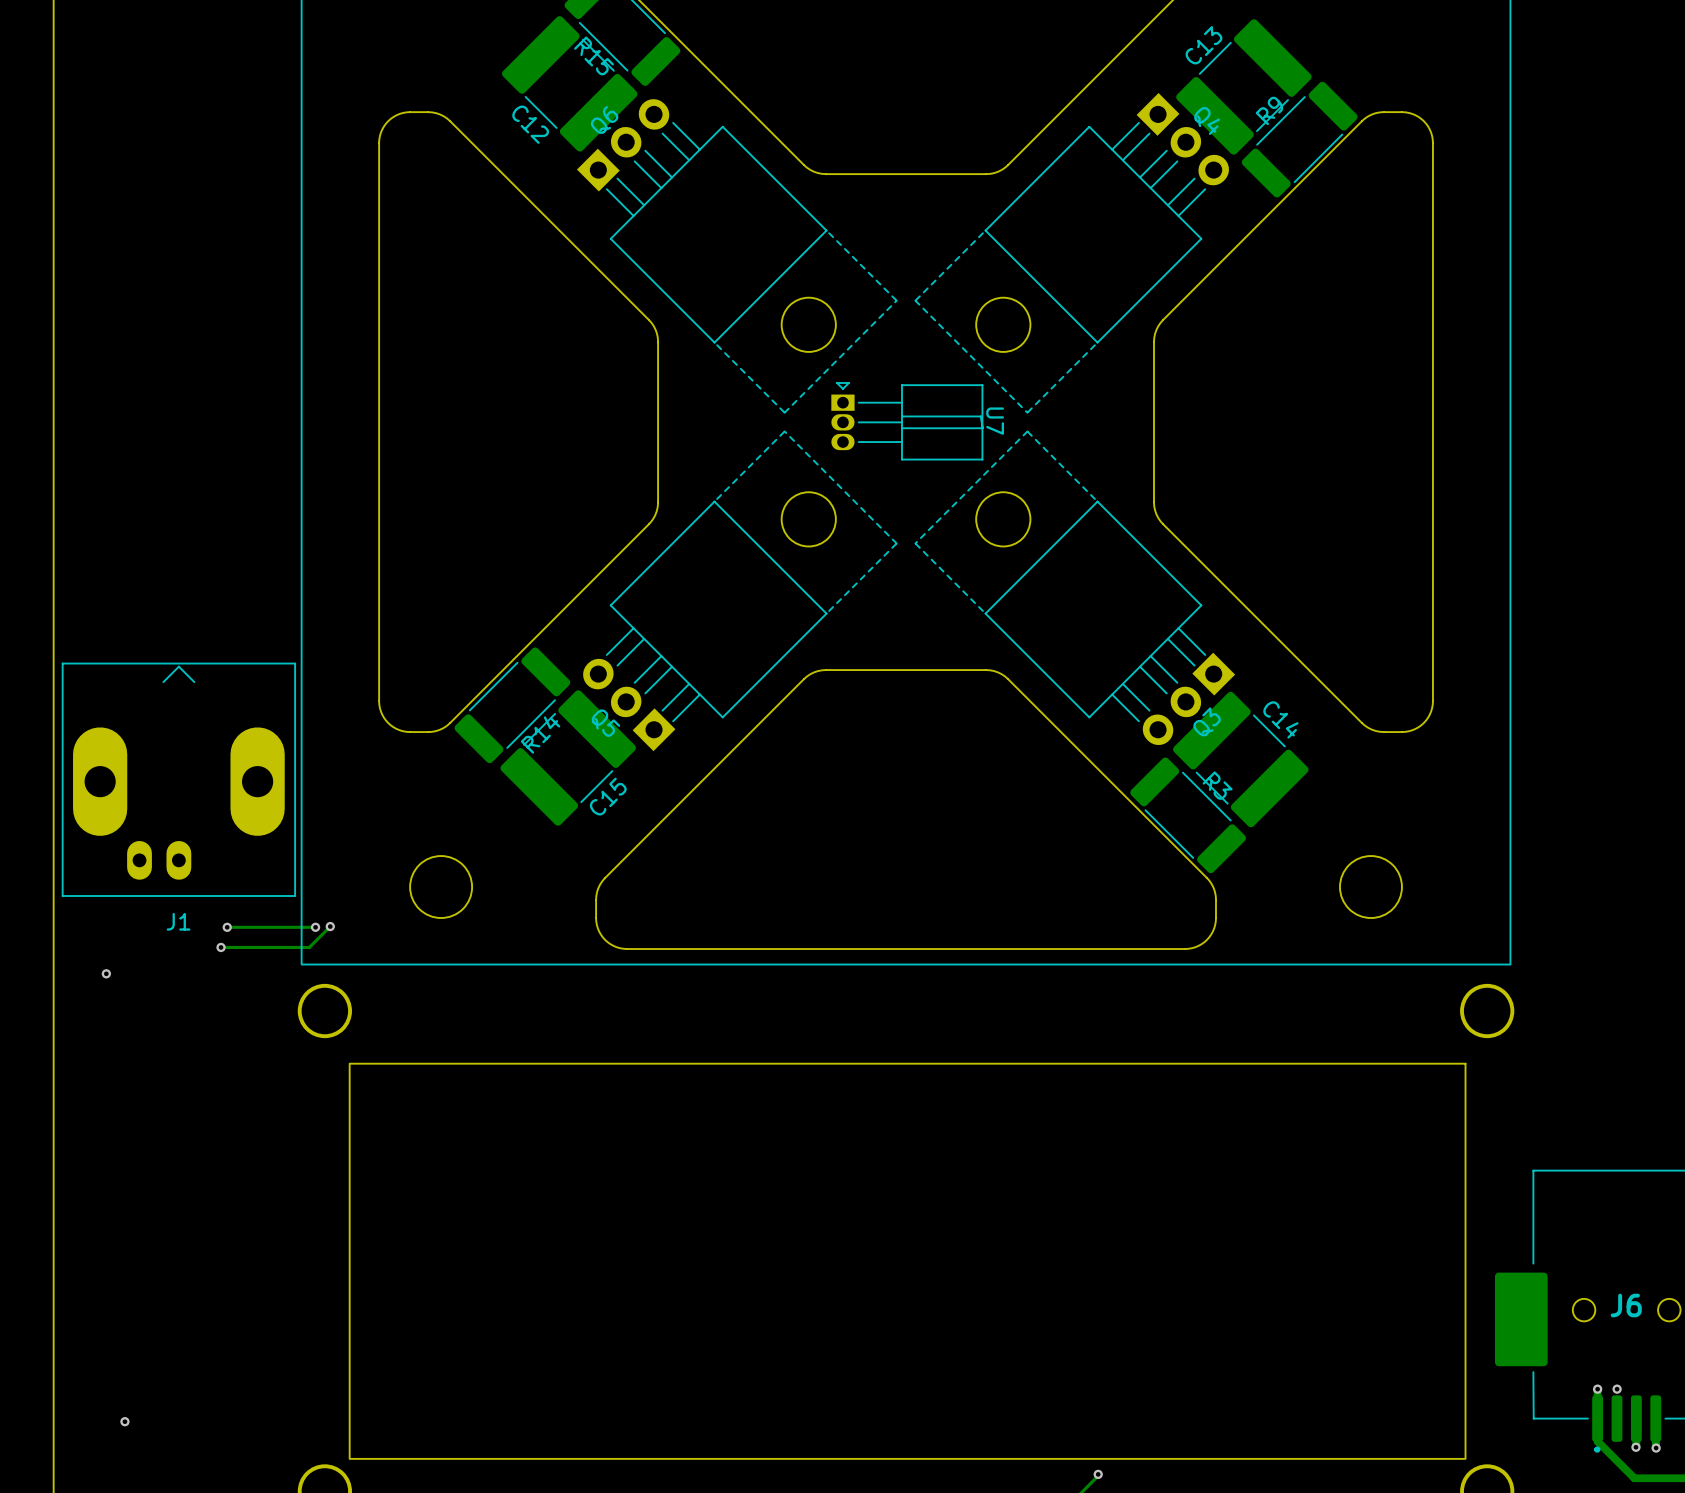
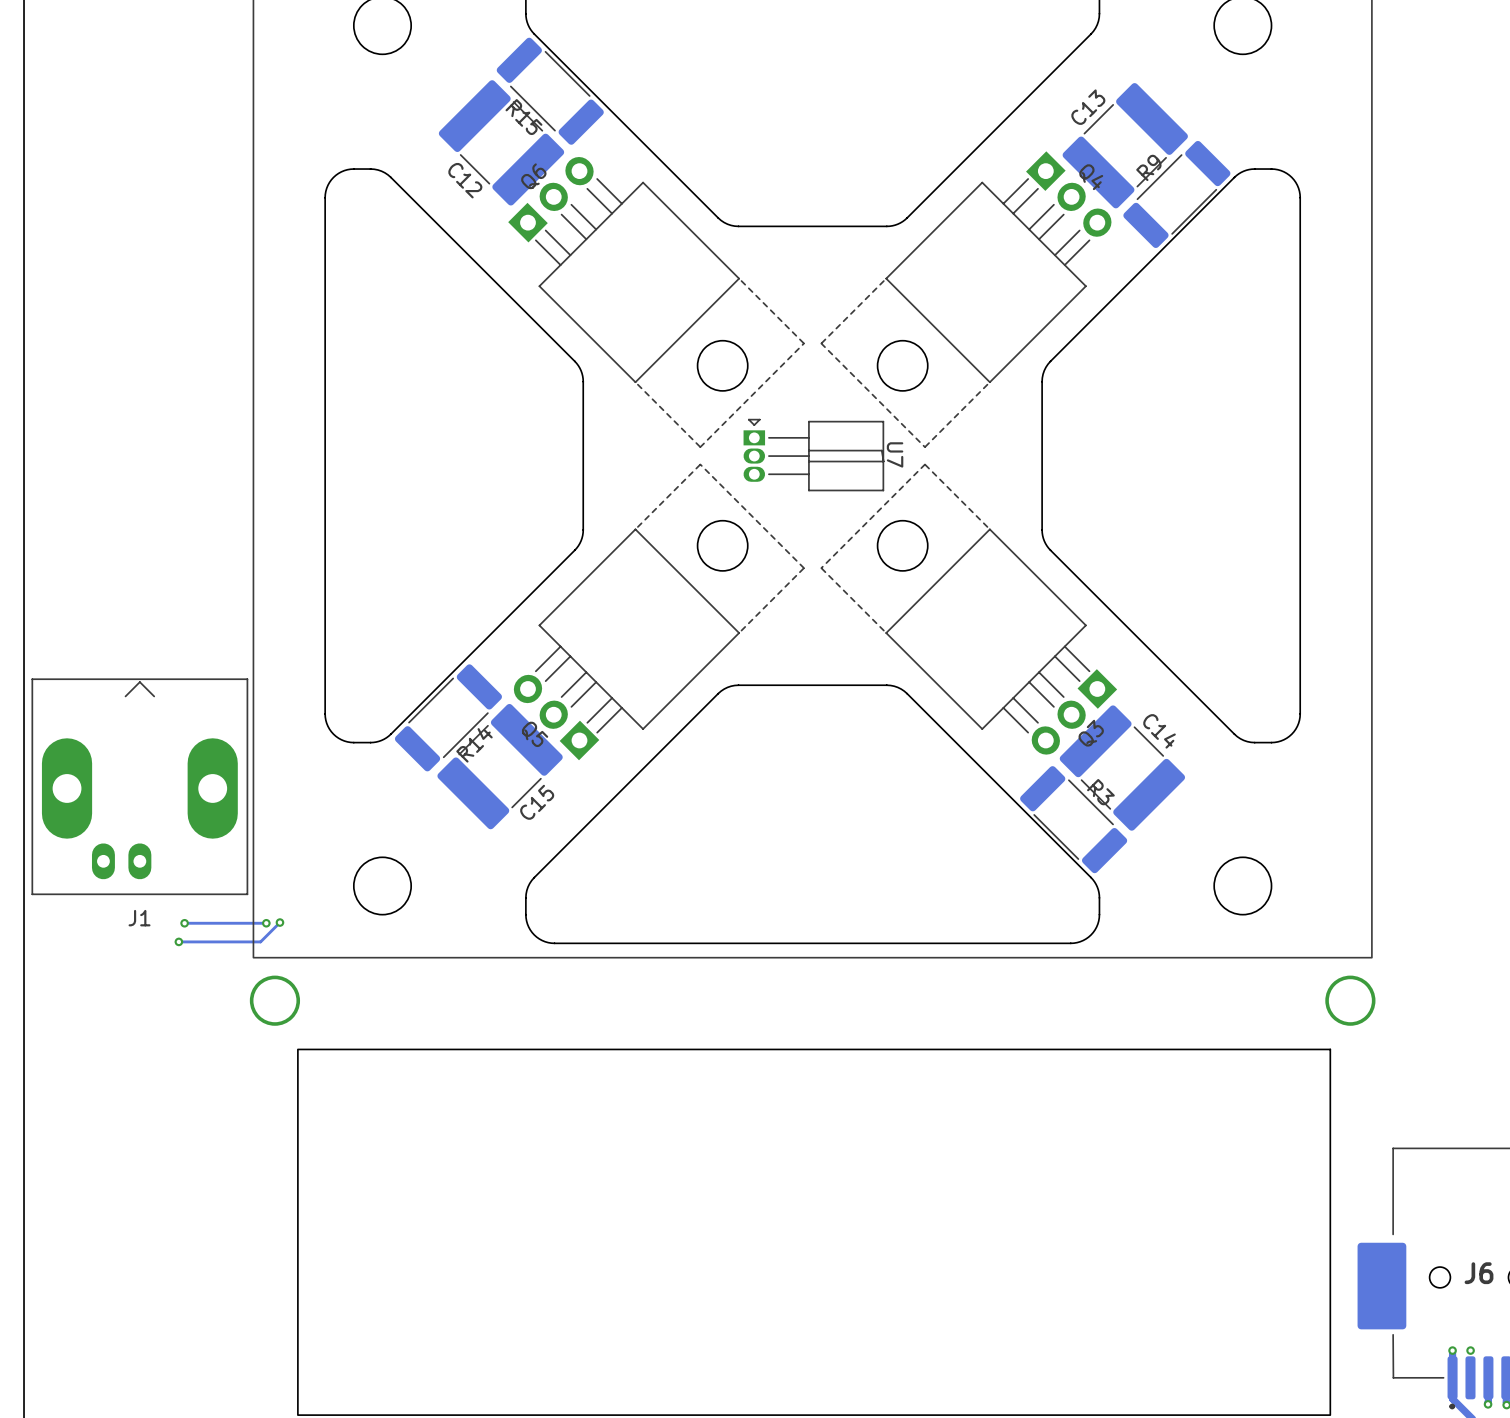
via: (106, 973) -> none
via: (124, 1421) -> none

